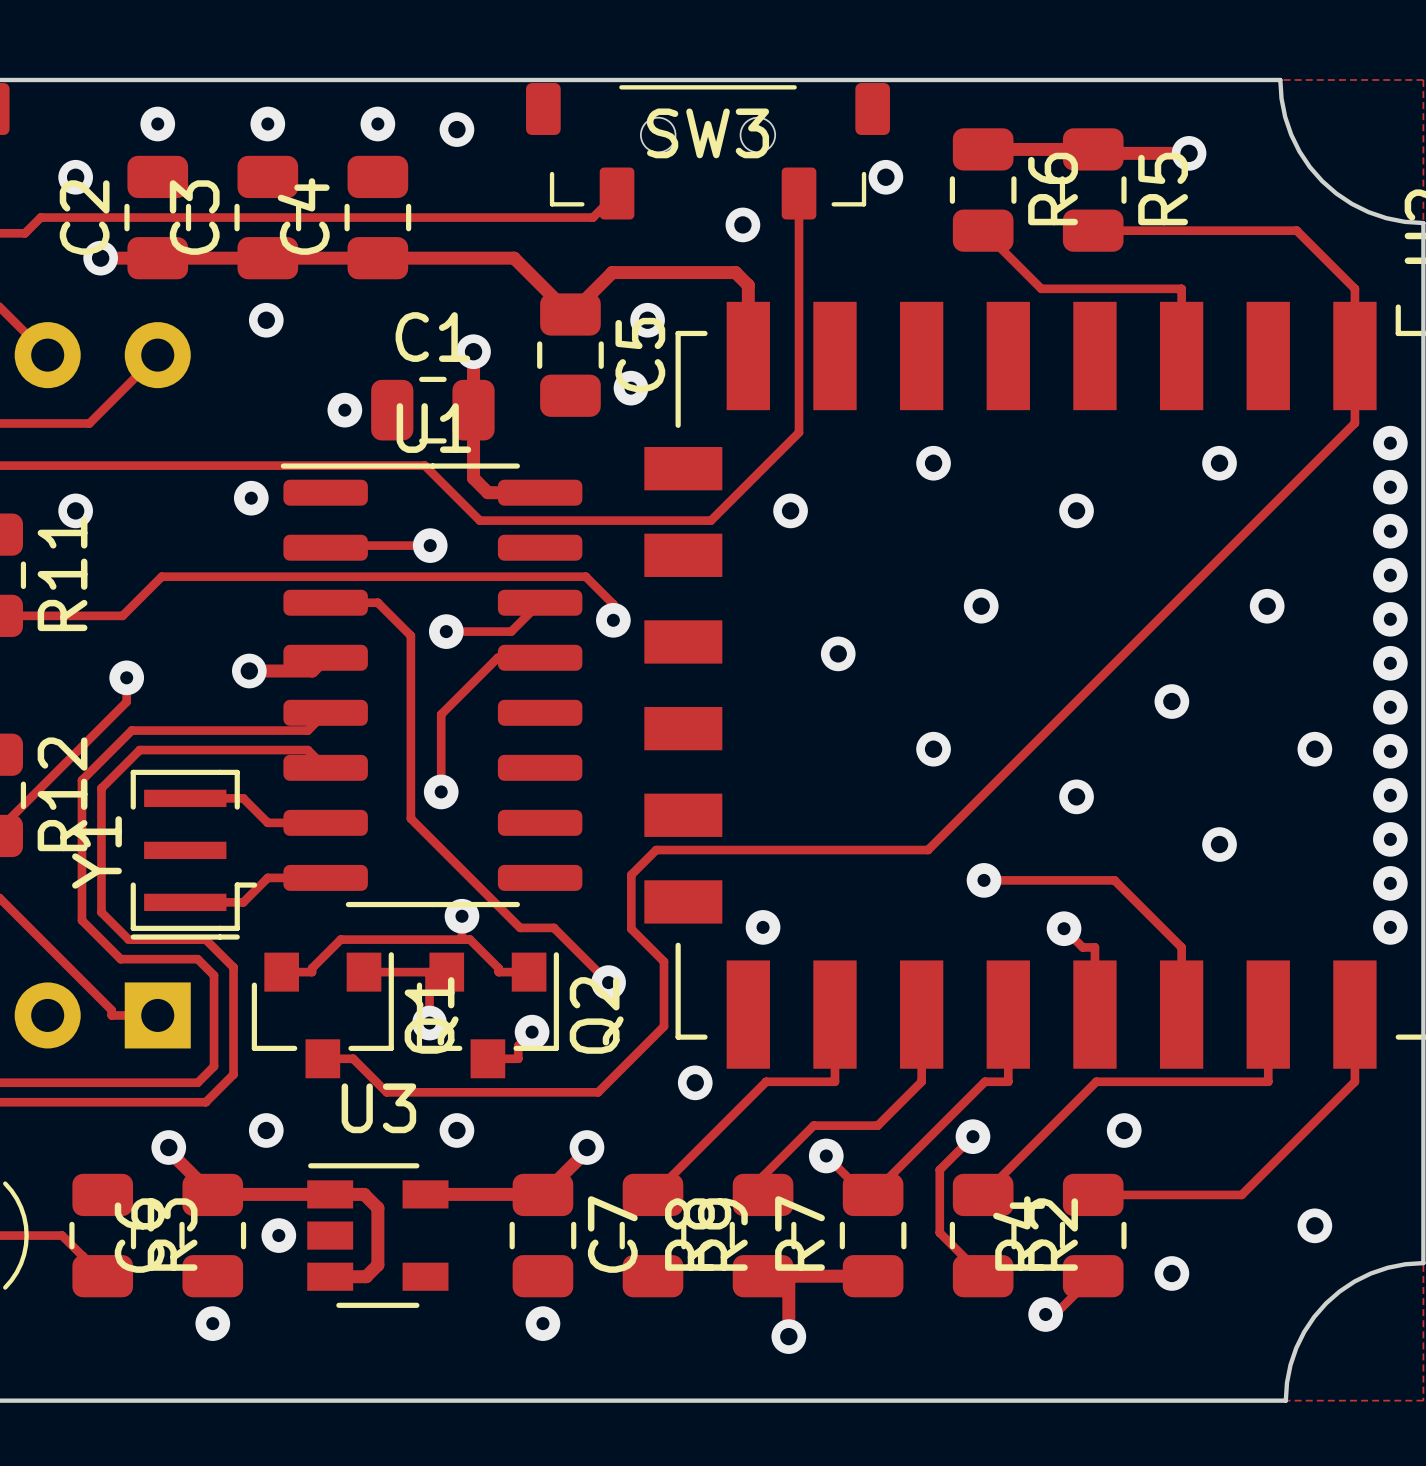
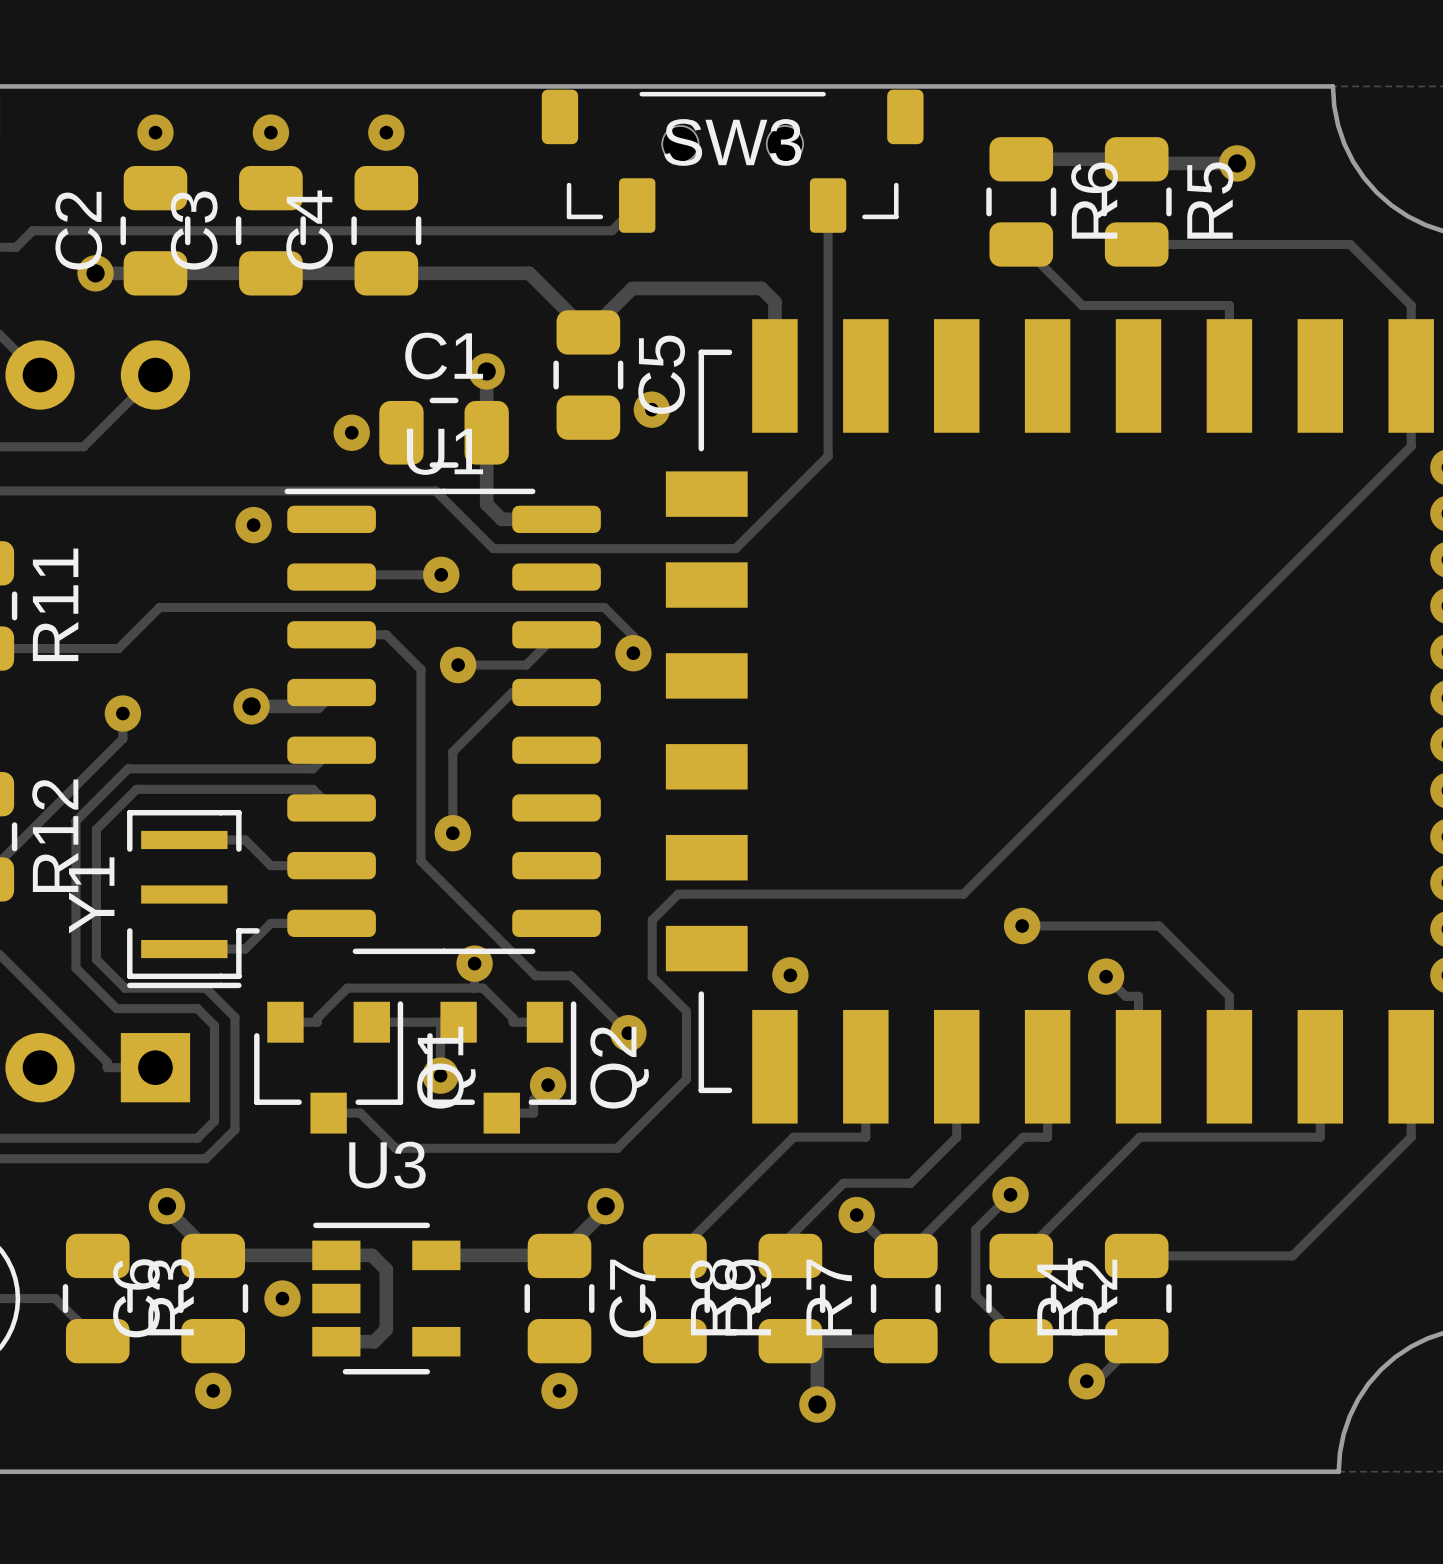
via: (456, 129) -> none
via: (75, 177) -> none
via: (885, 177) -> none
via: (742, 224) -> none
via: (266, 320) -> none
via: (647, 320) -> none
via: (933, 463) -> none
via: (1219, 463) -> none
via: (75, 510) -> none
via: (790, 510) -> none
via: (1076, 510) -> none
via: (981, 606) -> none
via: (1267, 606) -> none
via: (838, 653) -> none
via: (1171, 701) -> none
via: (933, 749) -> none
via: (1314, 749) -> none
via: (1076, 796) -> none
via: (1219, 844) -> none
via: (695, 1082) -> none
via: (266, 1130) -> none
via: (456, 1130) -> none
via: (1124, 1130) -> none
via: (1314, 1225) -> none
via: (1171, 1273) -> none

